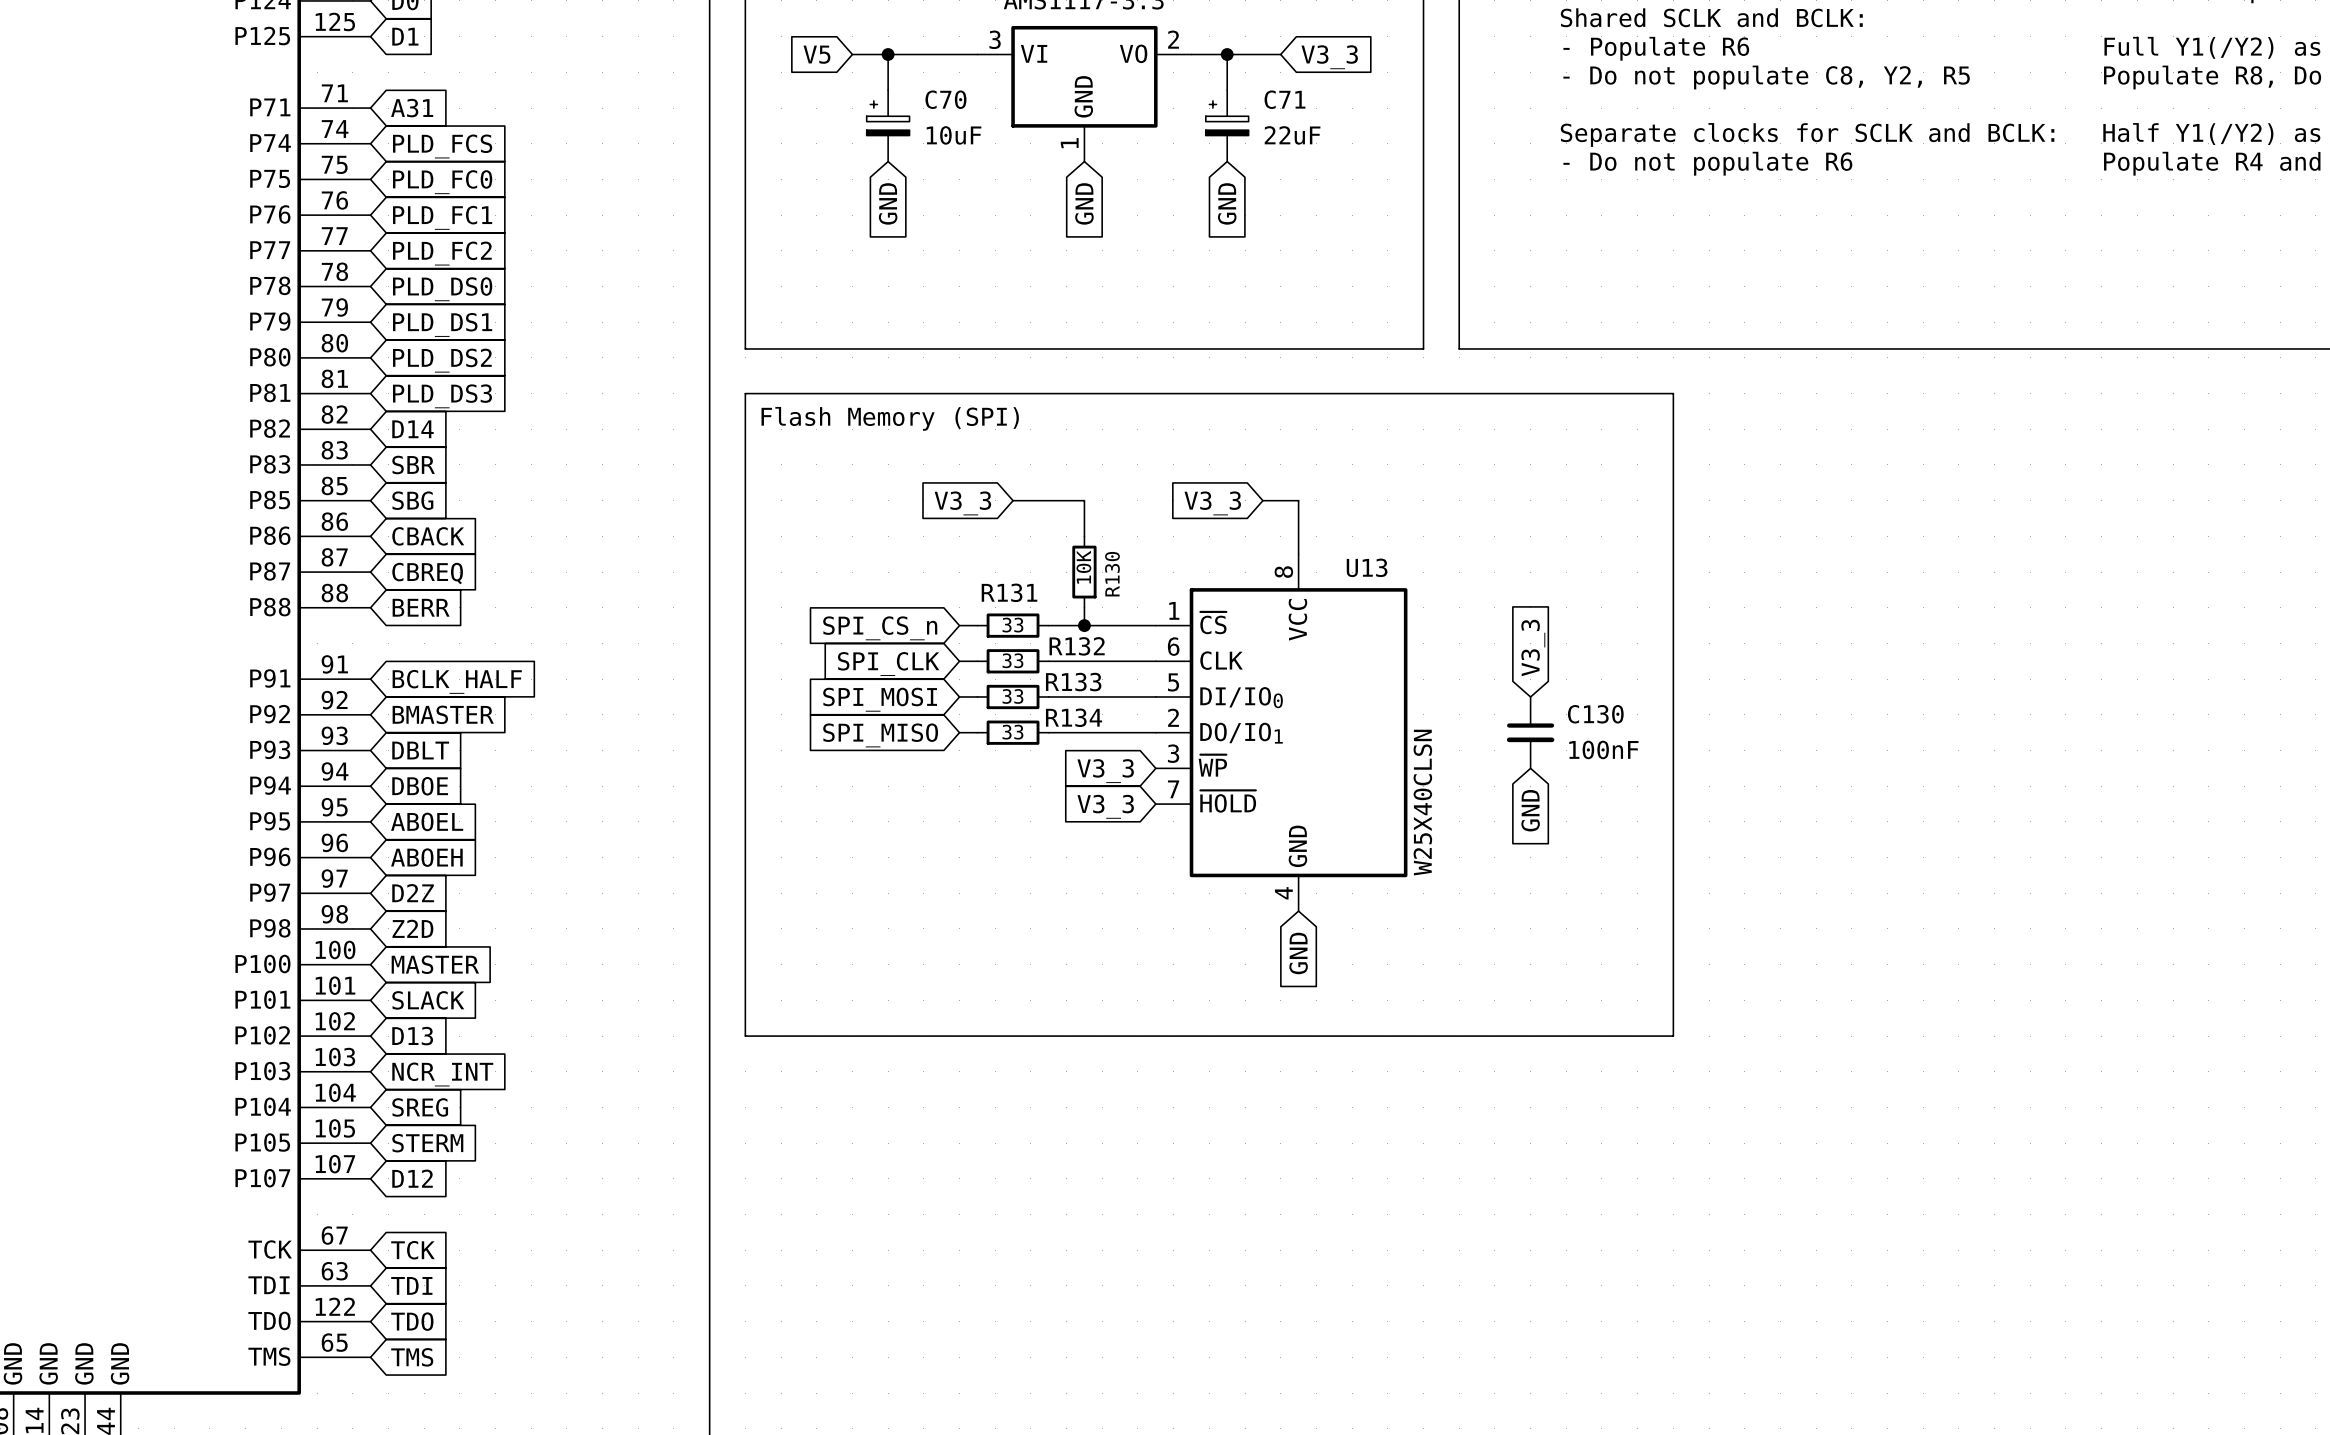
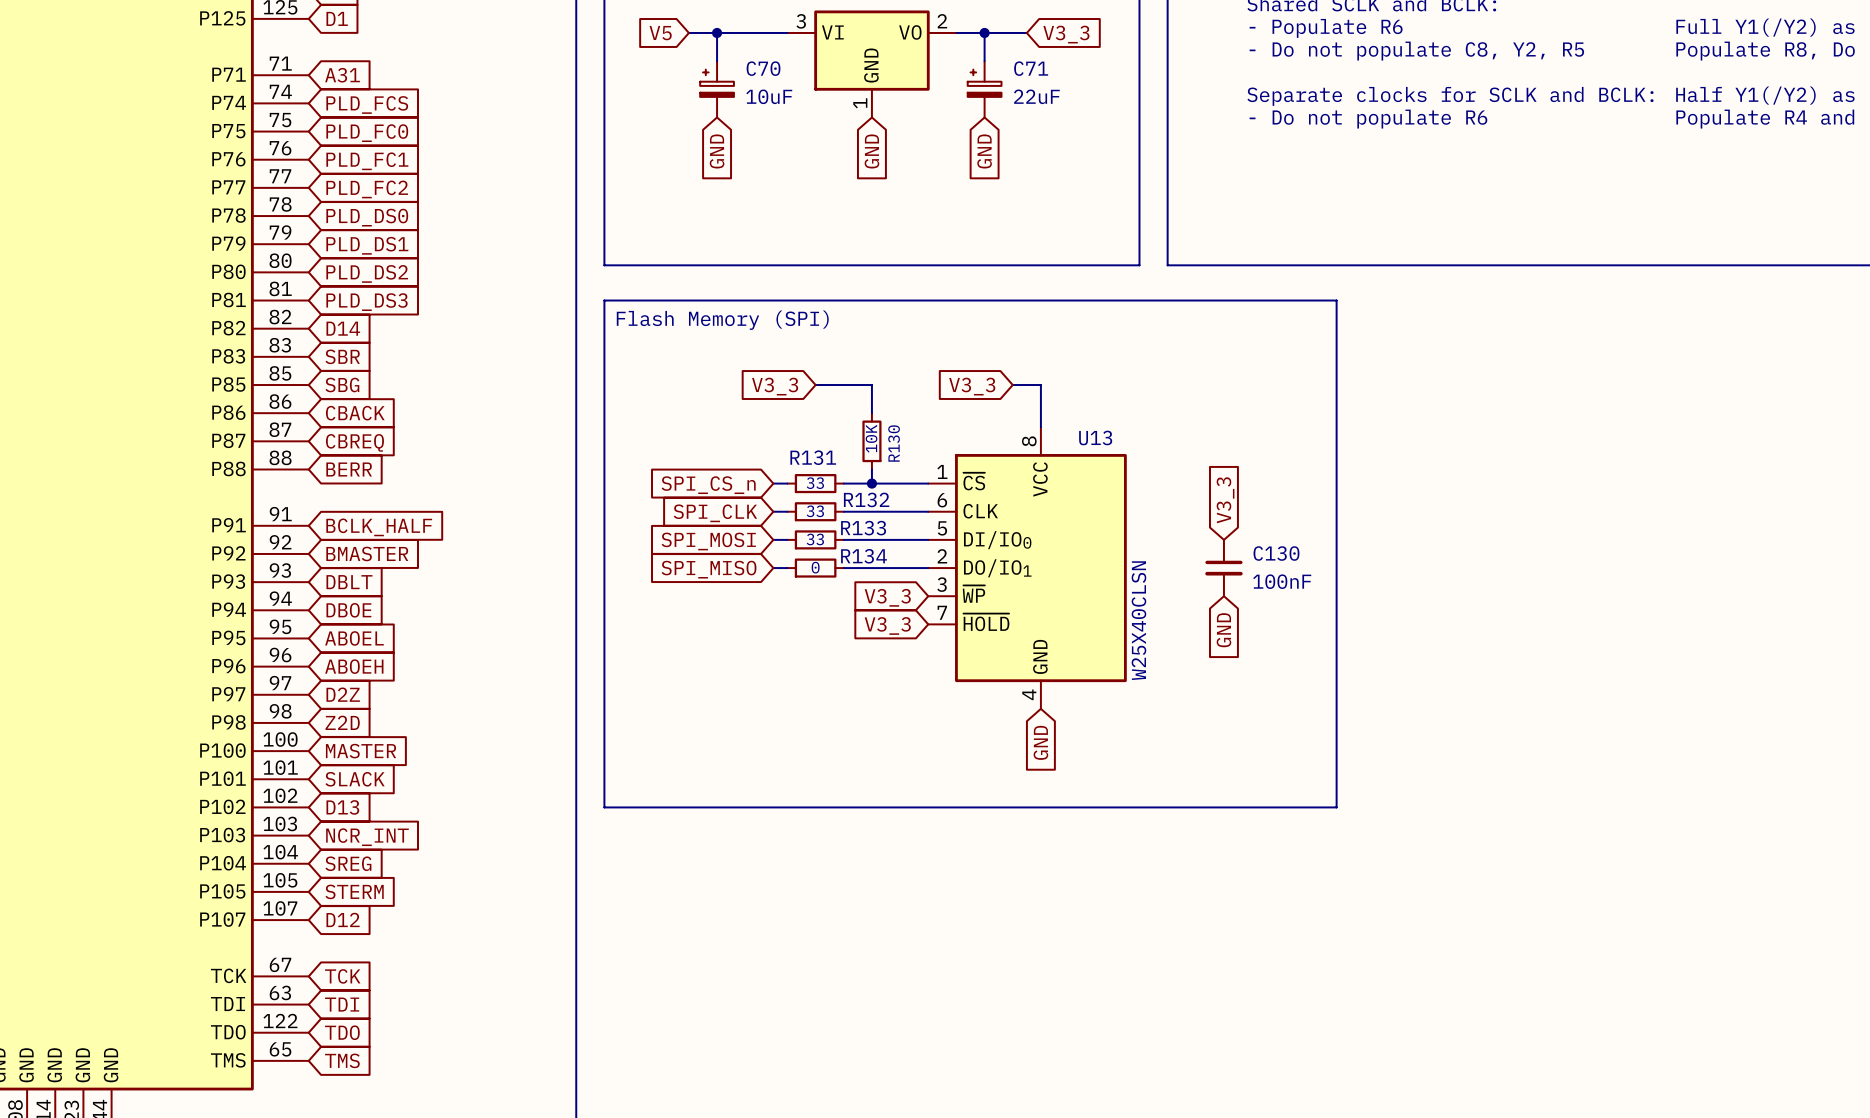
R134 value: 33 (1012, 732) -> 0 (815, 567)

